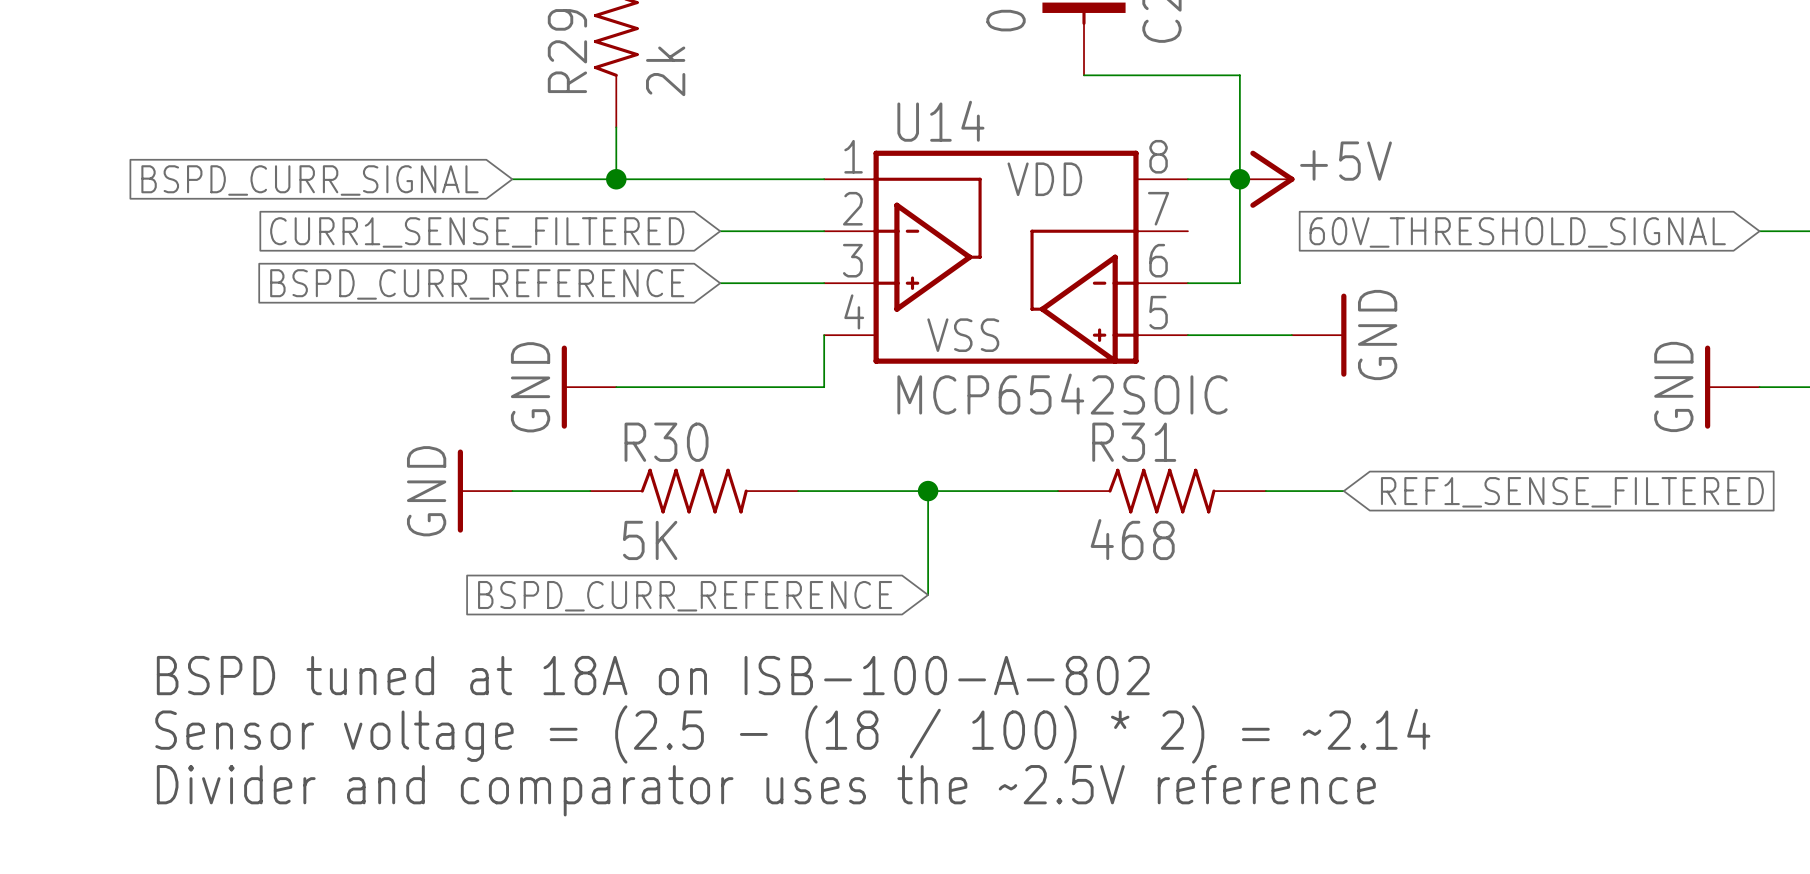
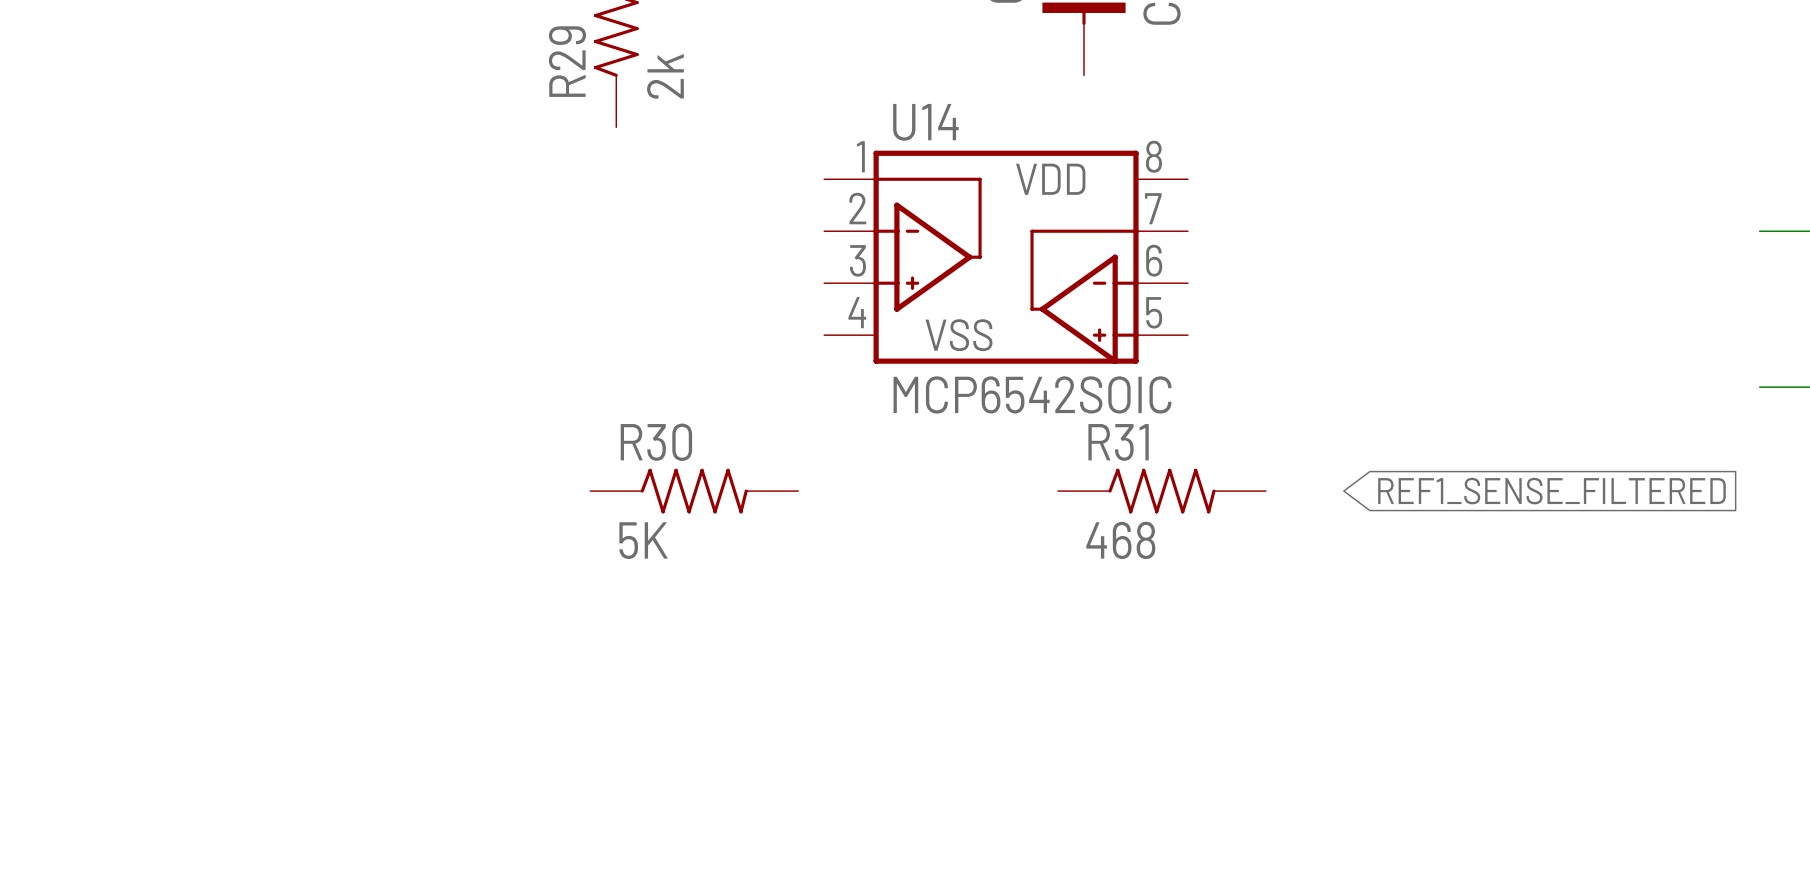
wire: (1084, 75) (1239, 75) (1239, 283) (1187, 283) -> none
wire: (616, 127) (616, 179) -> none
wire: (512, 179) (824, 179) -> none
junction: (616, 179) -> none
wire: (1187, 179) (1239, 179) -> none
junction: (1239, 179) -> none
power symbol: +5V (1267, 179) -> none
global label: BSPD_CURR_SIGNAL (309, 180) -> none
wire: (720, 231) (824, 231) -> none
global label: CURR1_SENSE_FILTERED (477, 232) -> none
global label: 60V_THRESHOLD_SIGNAL (1517, 232) -> none
wire: (720, 283) (824, 283) -> none
global label: BSPD_CURR_REFERENCE (477, 284) -> none
wire: (824, 335) (824, 387) (616, 387) -> none
wire: (1187, 335) (1291, 335) -> none
power symbol: GND (1319, 335) -> none
power symbol: GND (589, 387) -> none
power symbol: GND (1732, 387) -> none
power symbol: GND (485, 491) -> none
wire: (512, 491) (590, 491) -> none
wire: (798, 491) (1058, 491) -> none
wire: (928, 491) (928, 595) -> none
junction: (928, 491) -> none
wire: (1265, 491) (1343, 491) -> none
global label: BSPD_CURR_REFERENCE (685, 596) -> none
text: BSPD tuned at 18A on ISB-100-A-802 (653, 675) -> none
text: Sensor voltage = (2.5 - (18 / 100) * 2) = ~2.14 (792, 734) -> none
text: Divider and comparator uses the ~2.5V reference (766, 790) -> none

